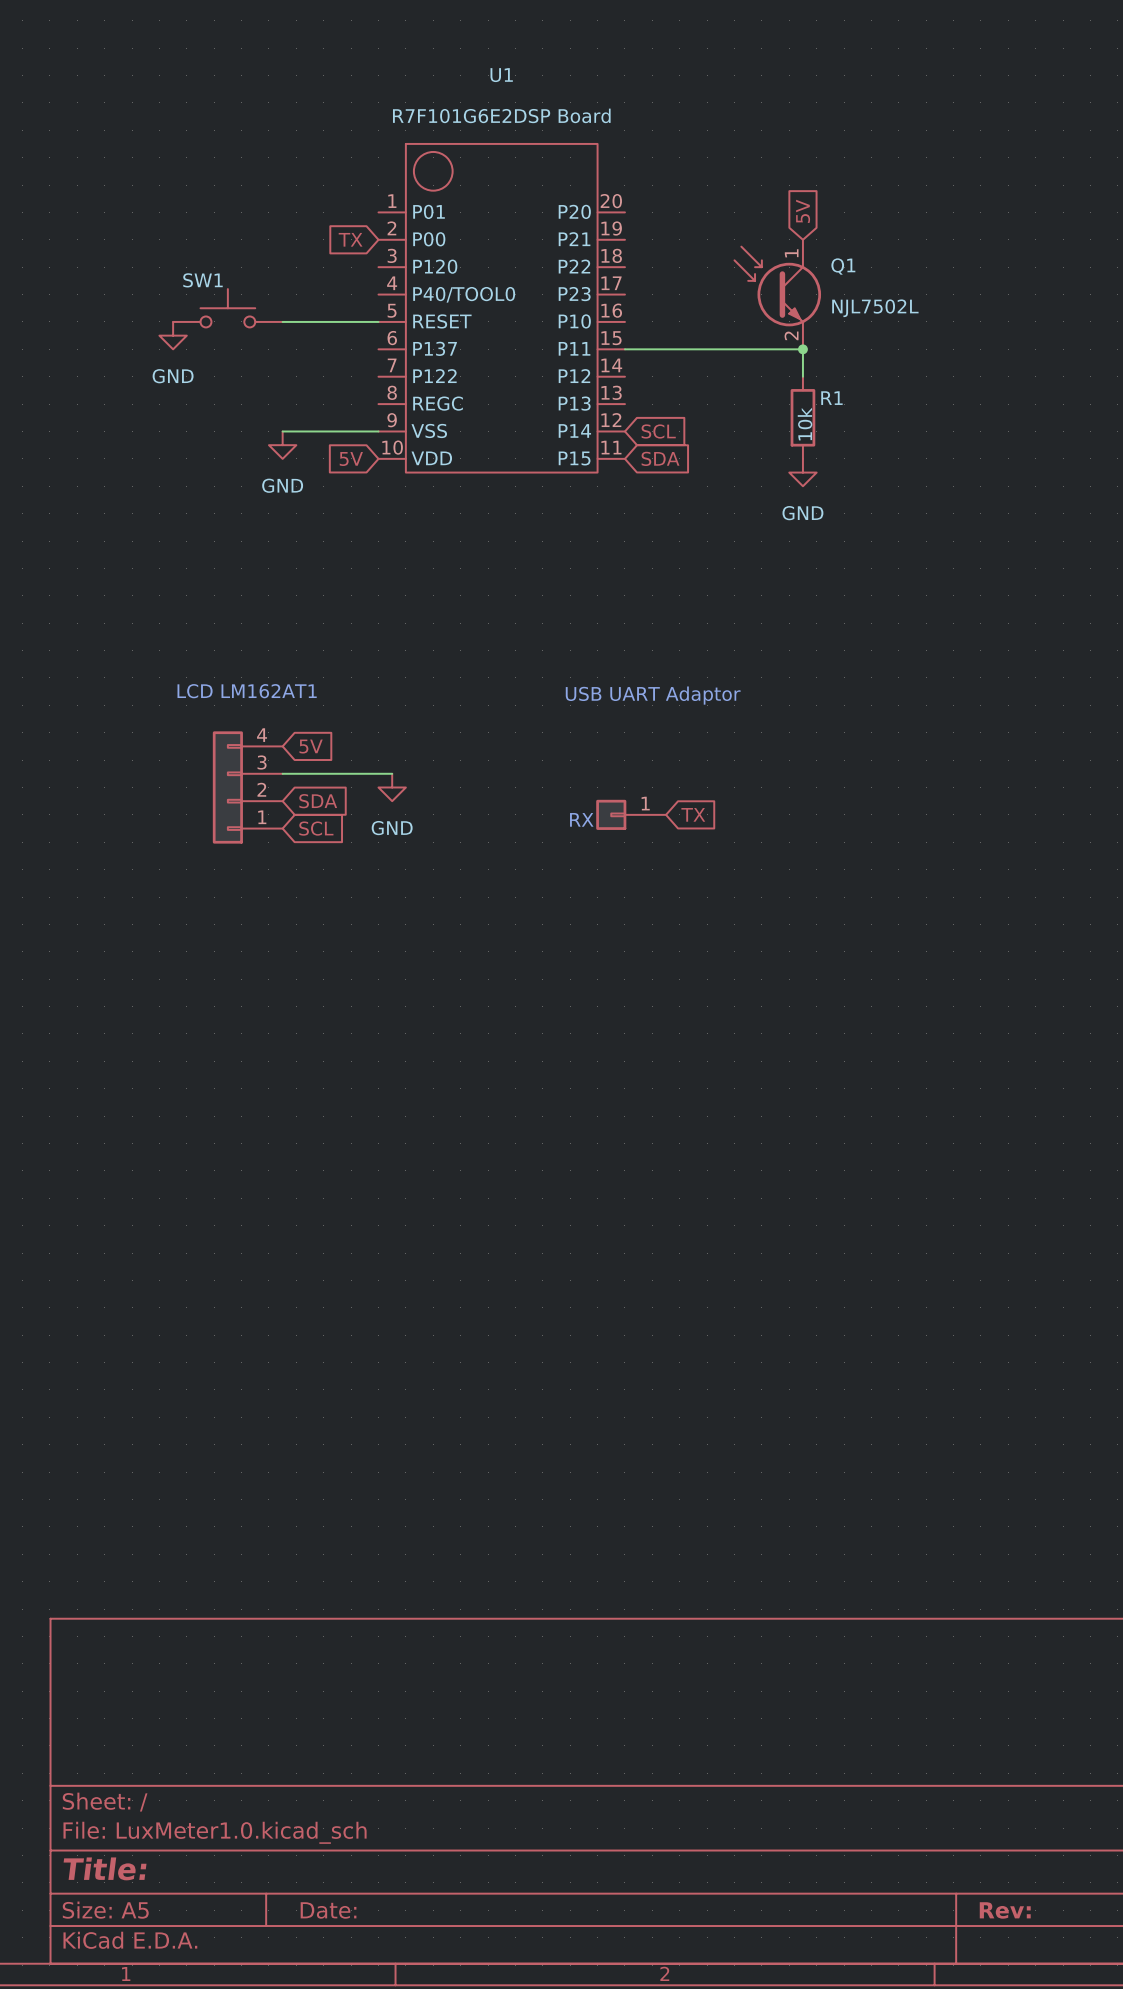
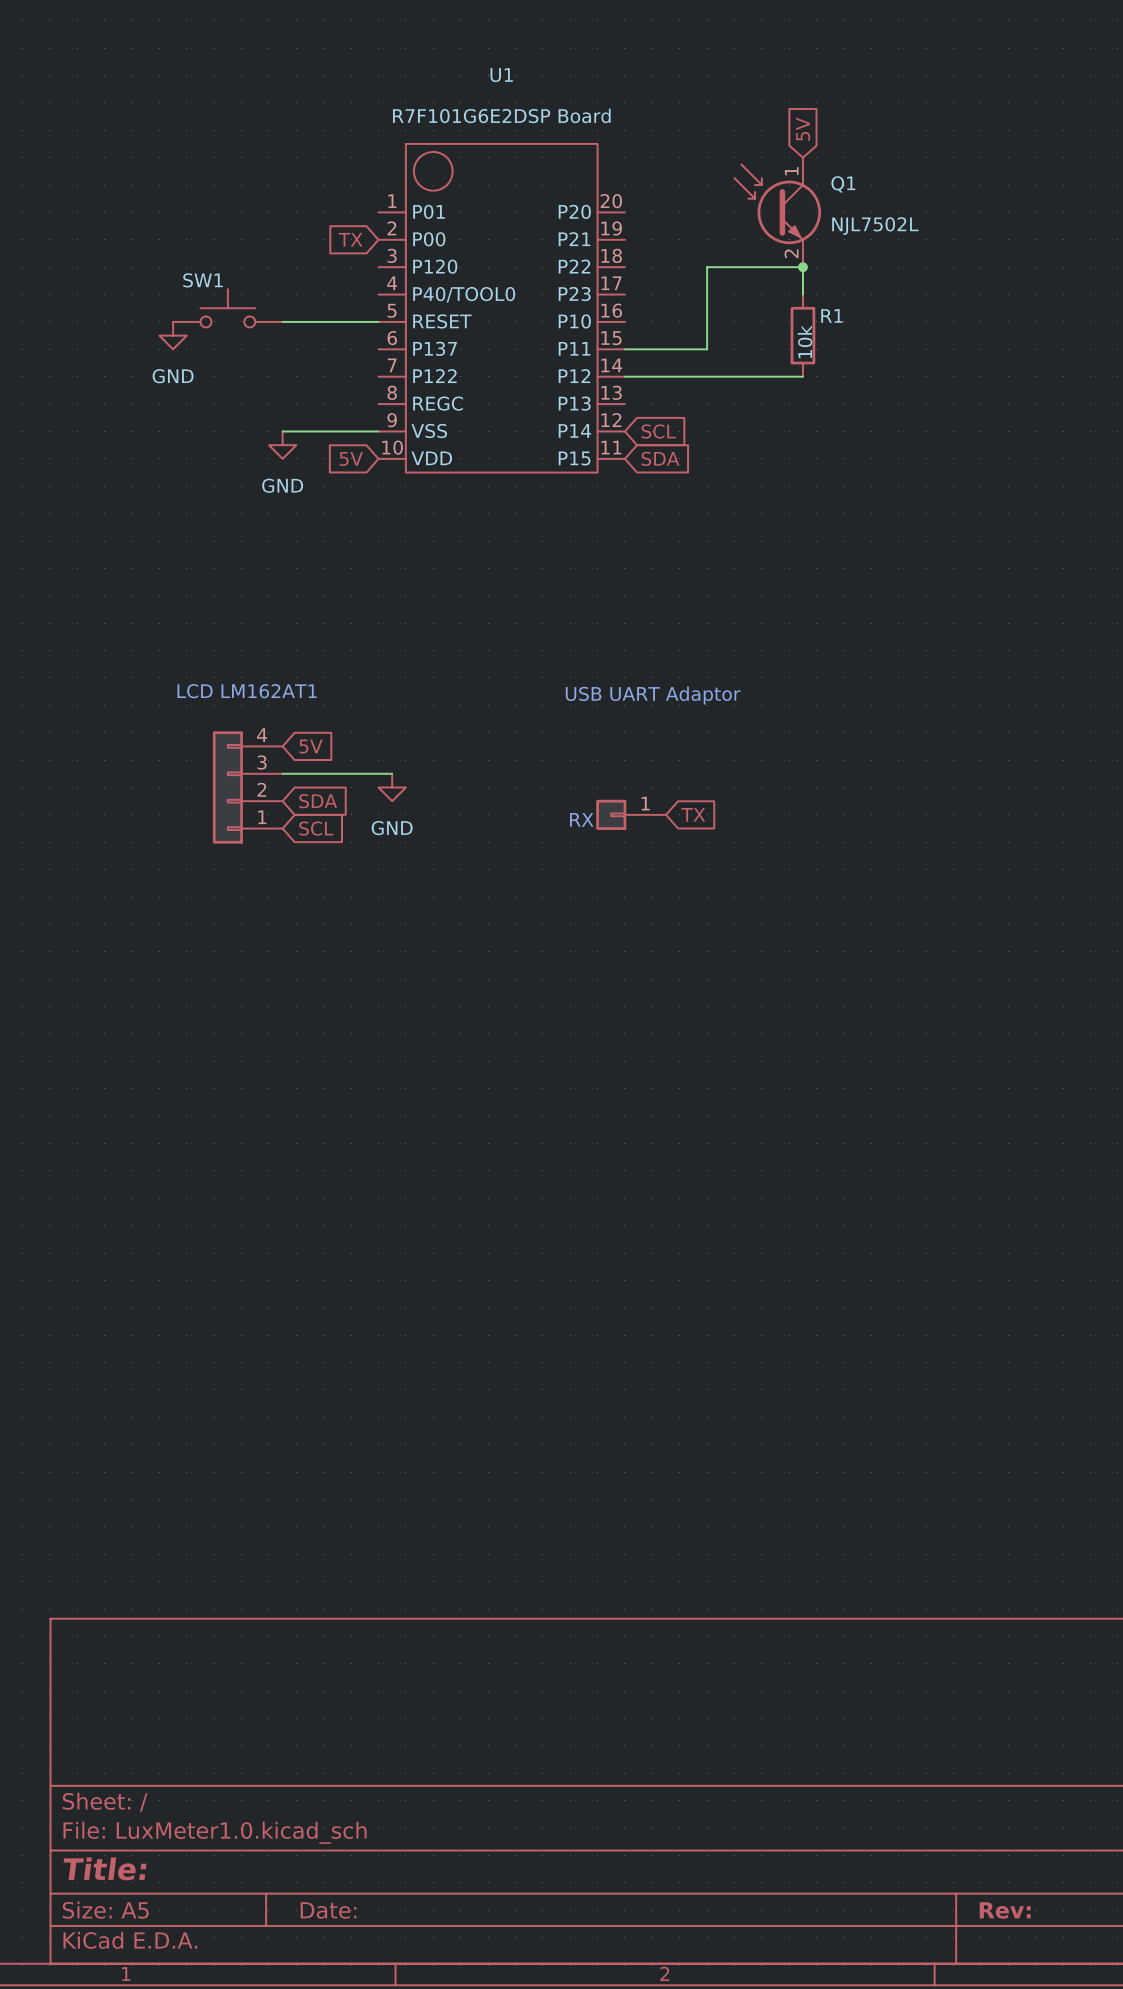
global label position: 5V (803, 211) -> 5V (803, 129)
junction: none -> (802, 267)
Q1 position: (777, 294) -> (777, 212)
wire: (707, 349) (802, 349) (802, 376) -> (707, 349) (707, 267) (802, 267) (802, 294)
junction: (802, 349) -> none
wire: none -> (624, 376) (802, 376)
R1 position: (802, 417) -> (802, 335)
power symbol: GND (802, 472) -> none

